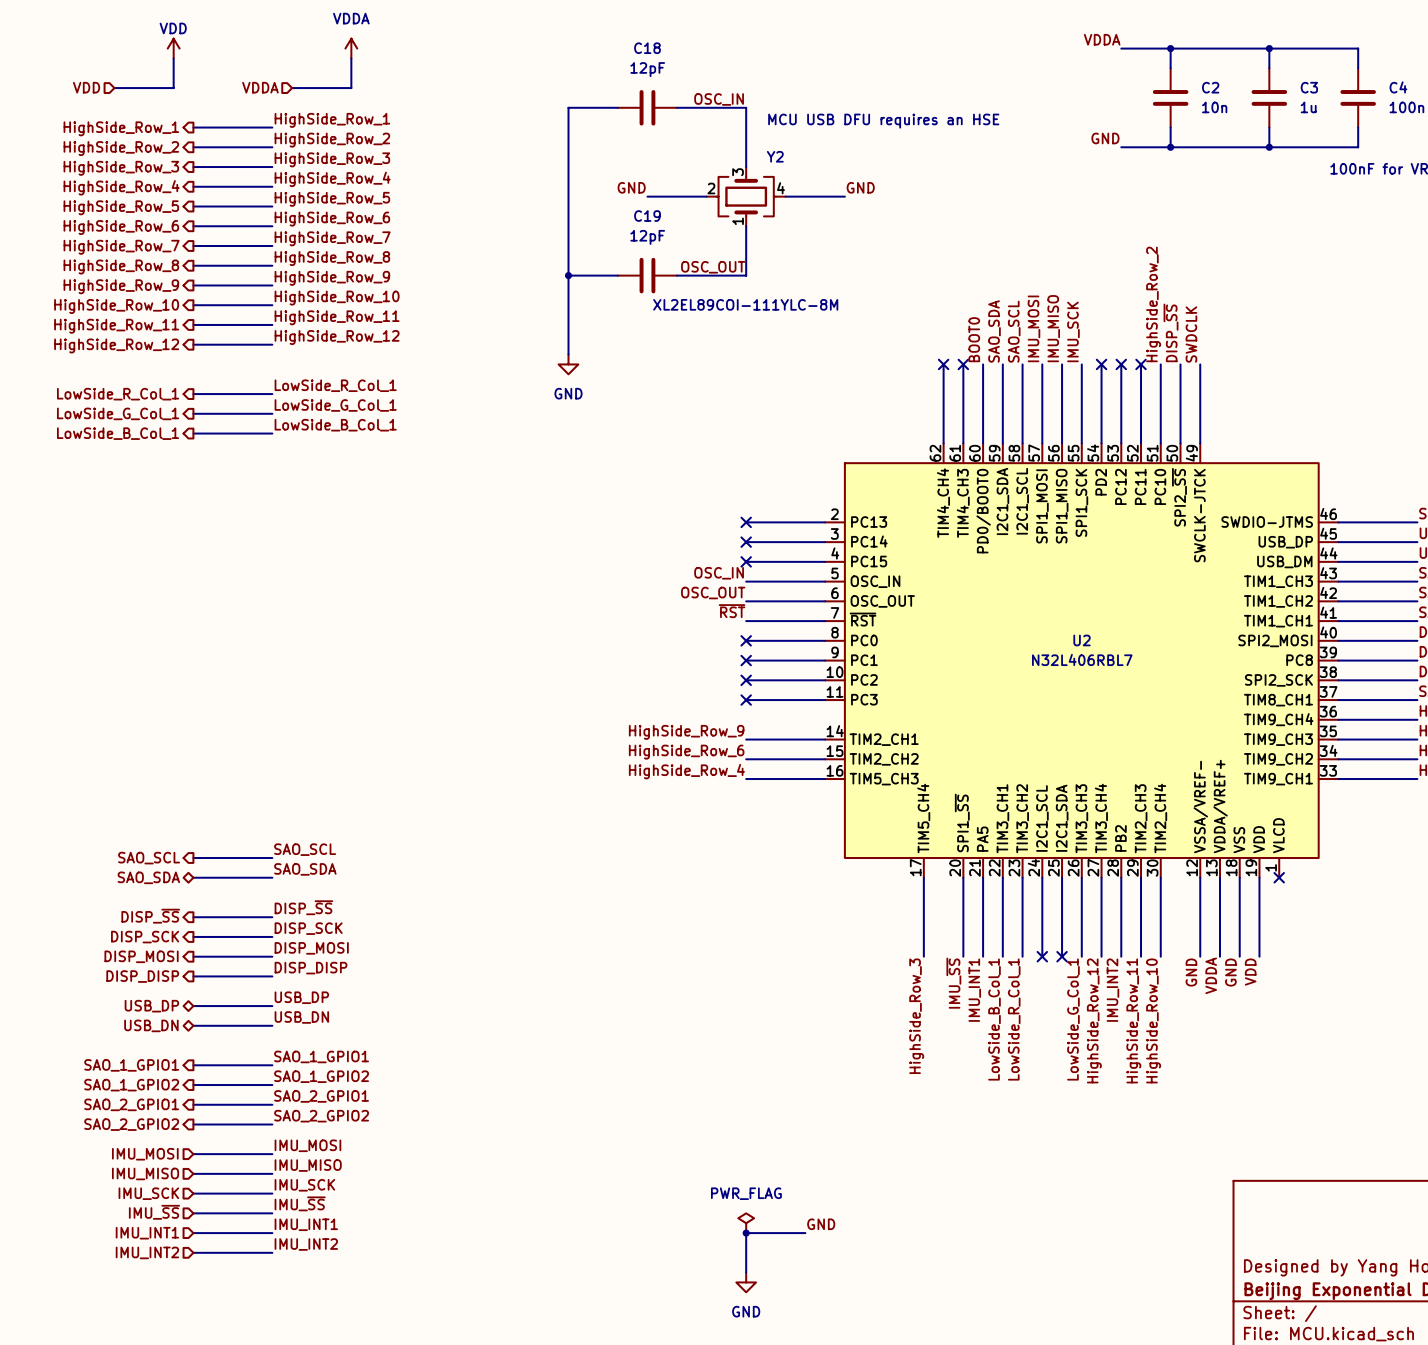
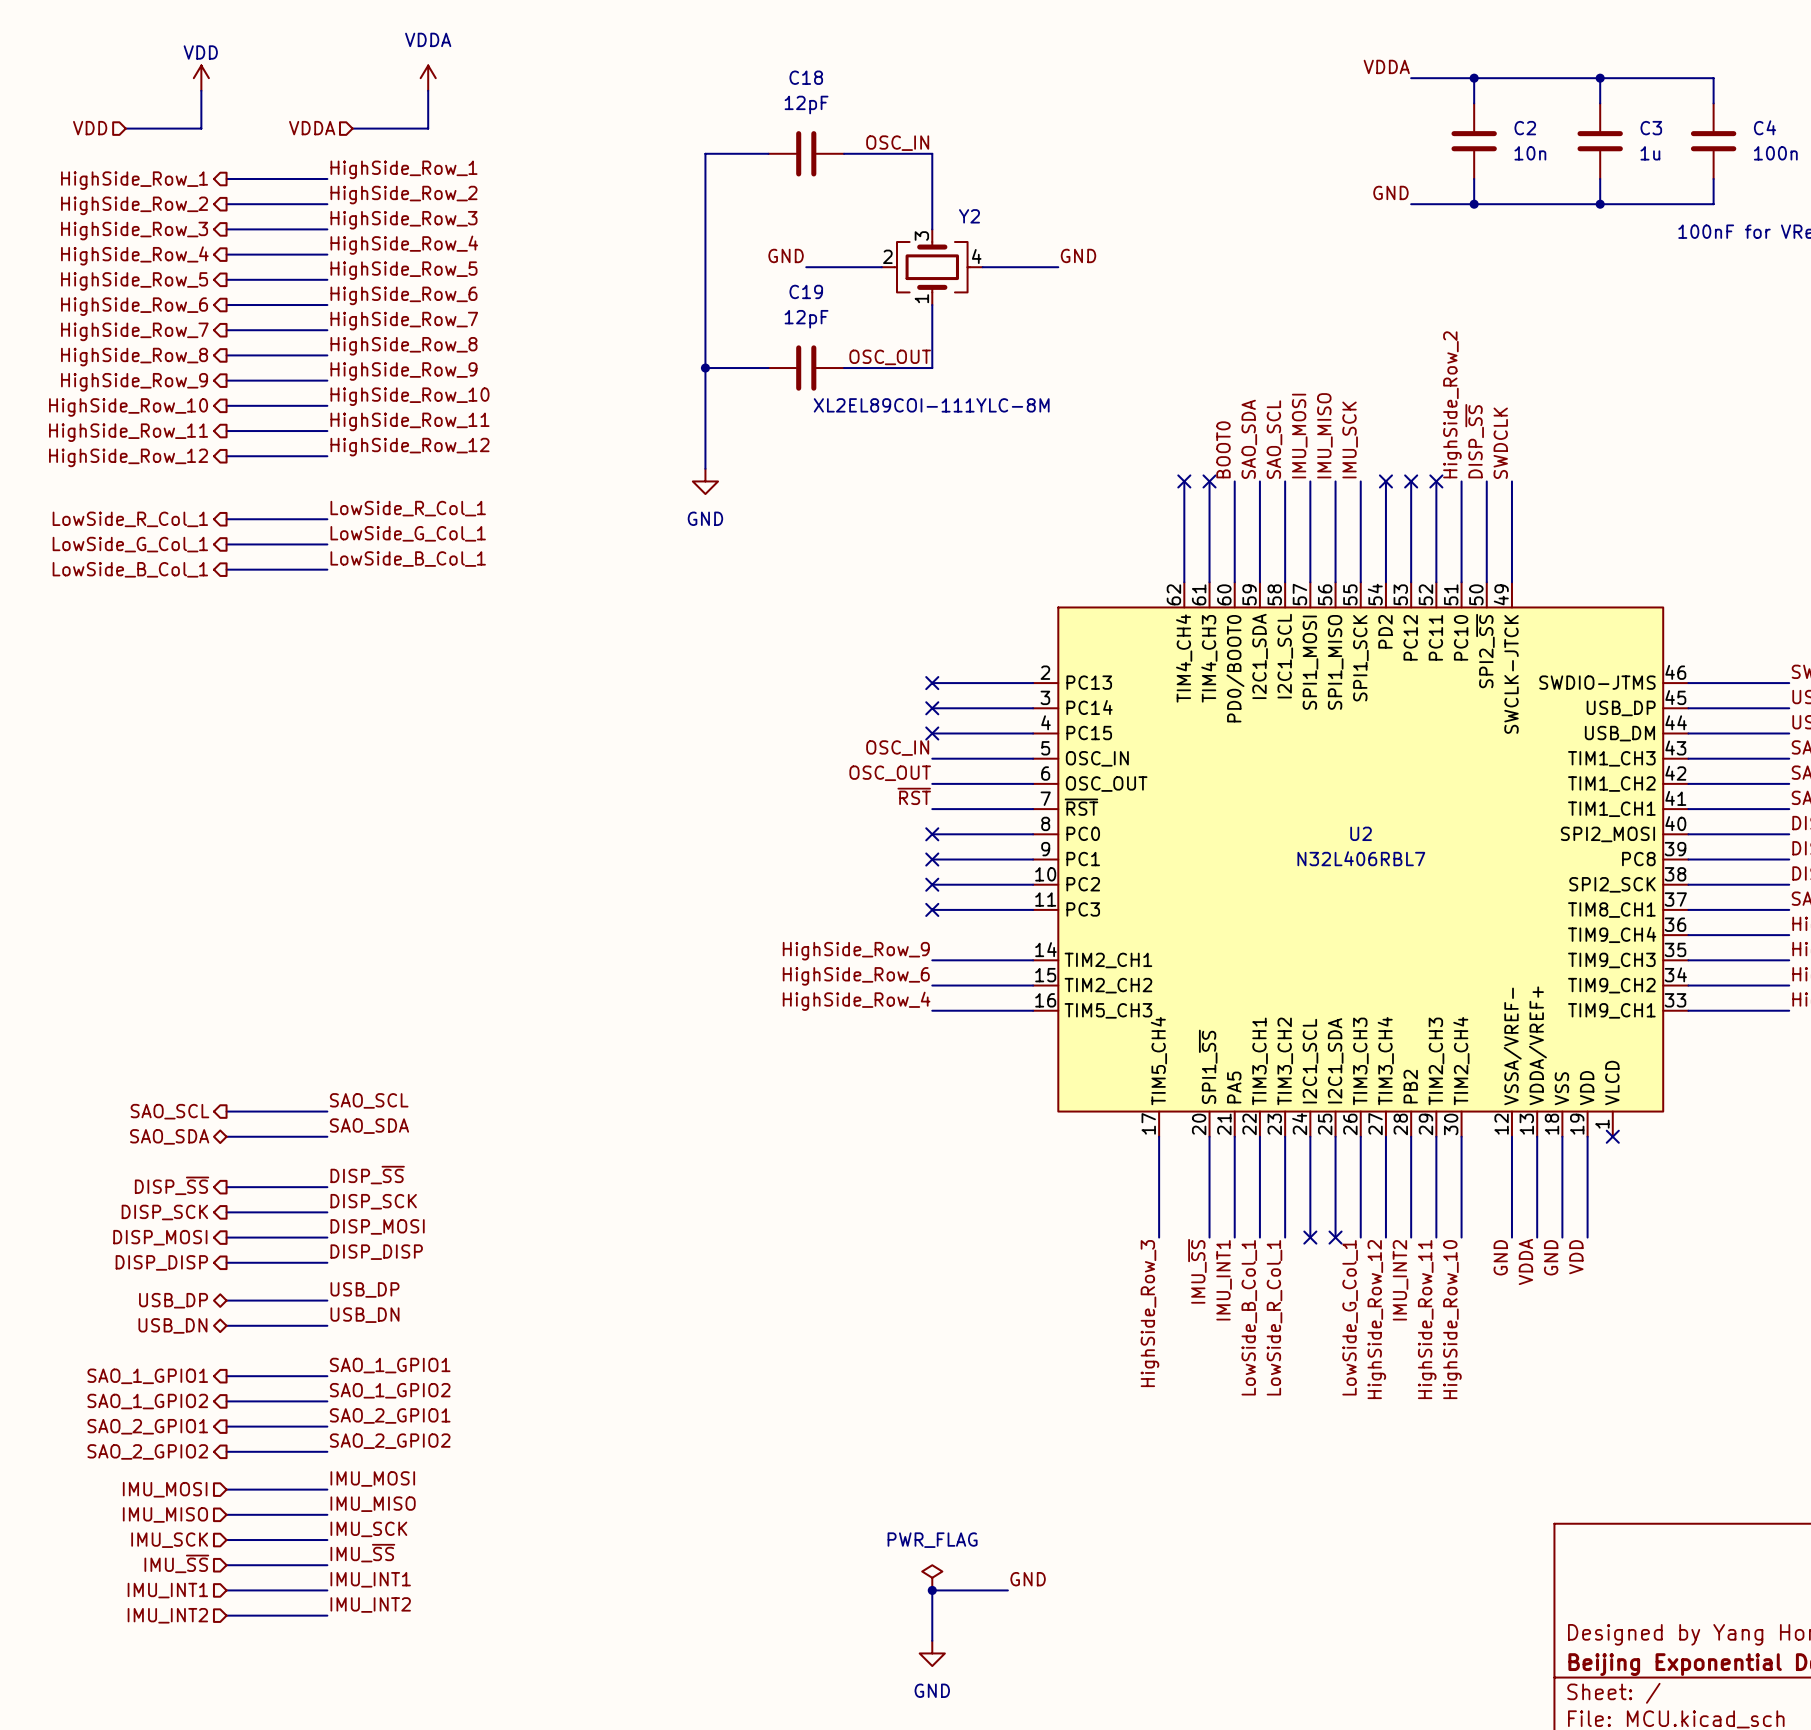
text: MCU USB DFU requires an HSE (883, 121) -> none

